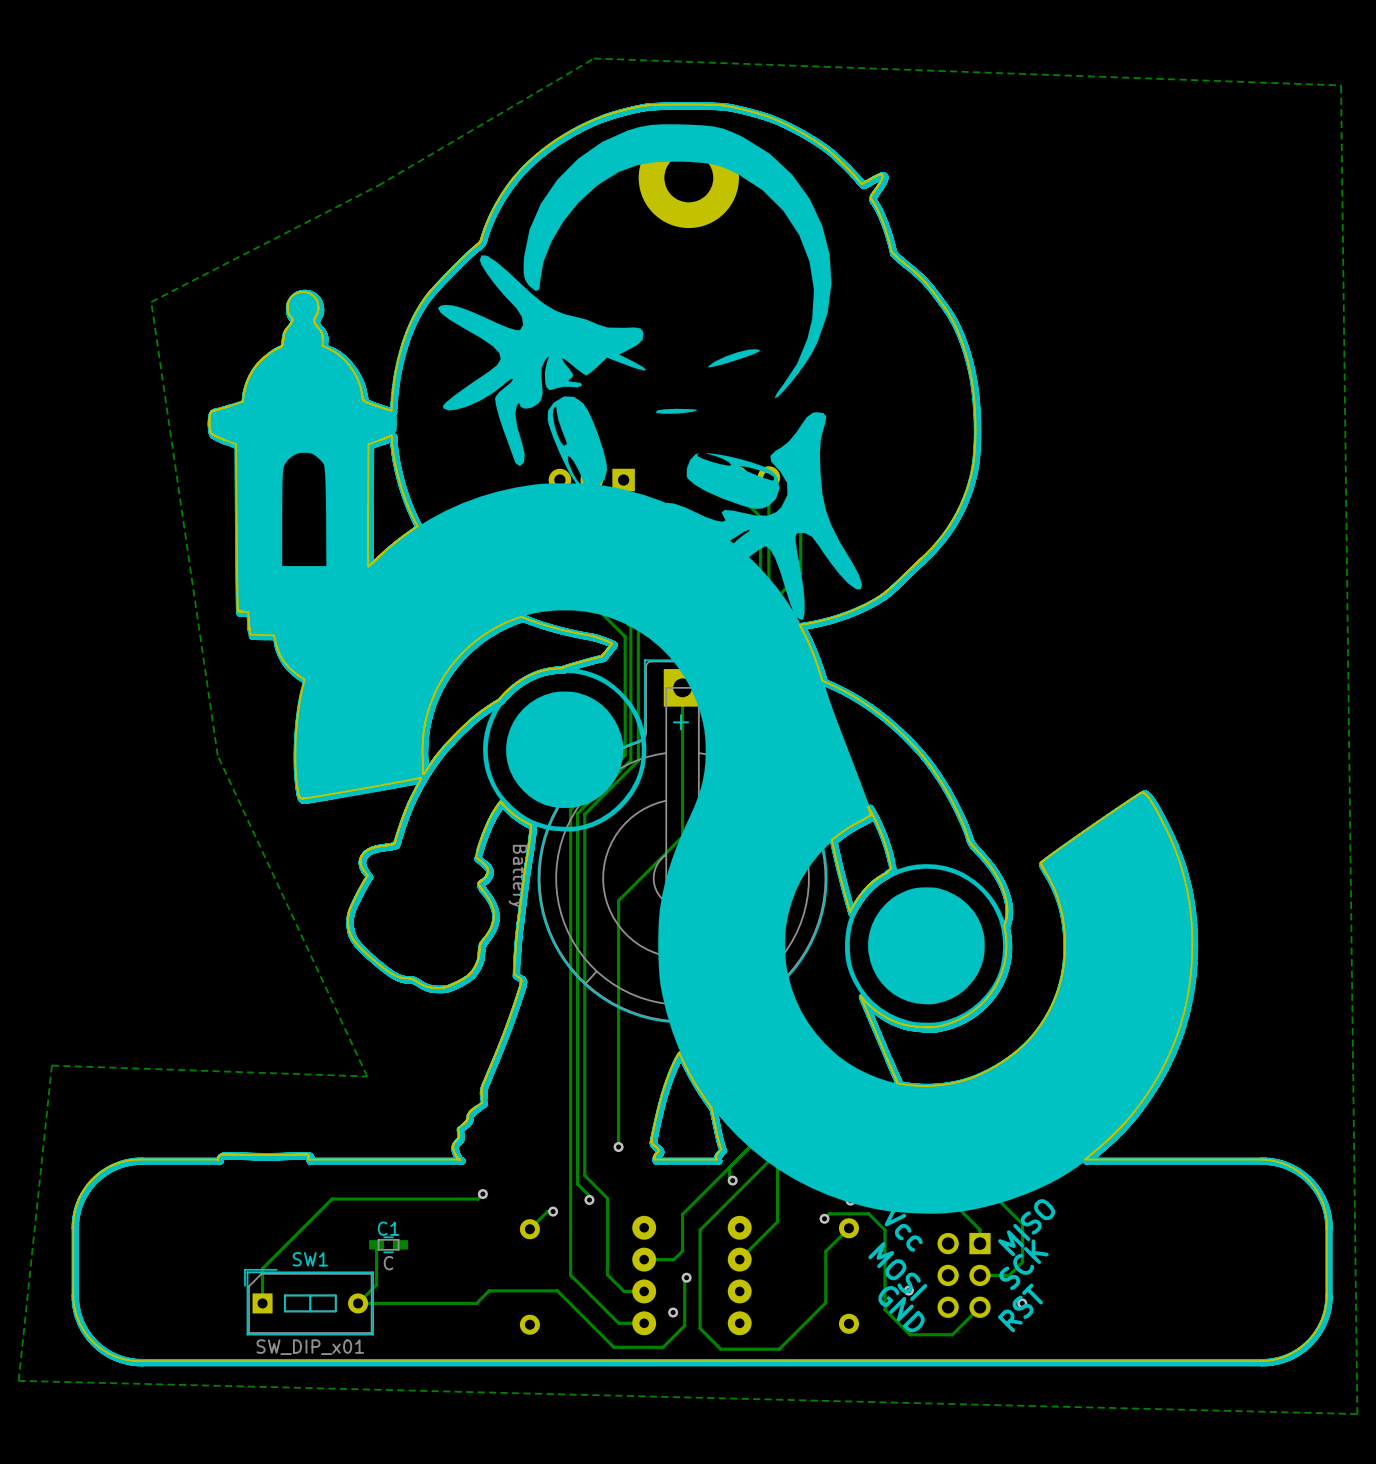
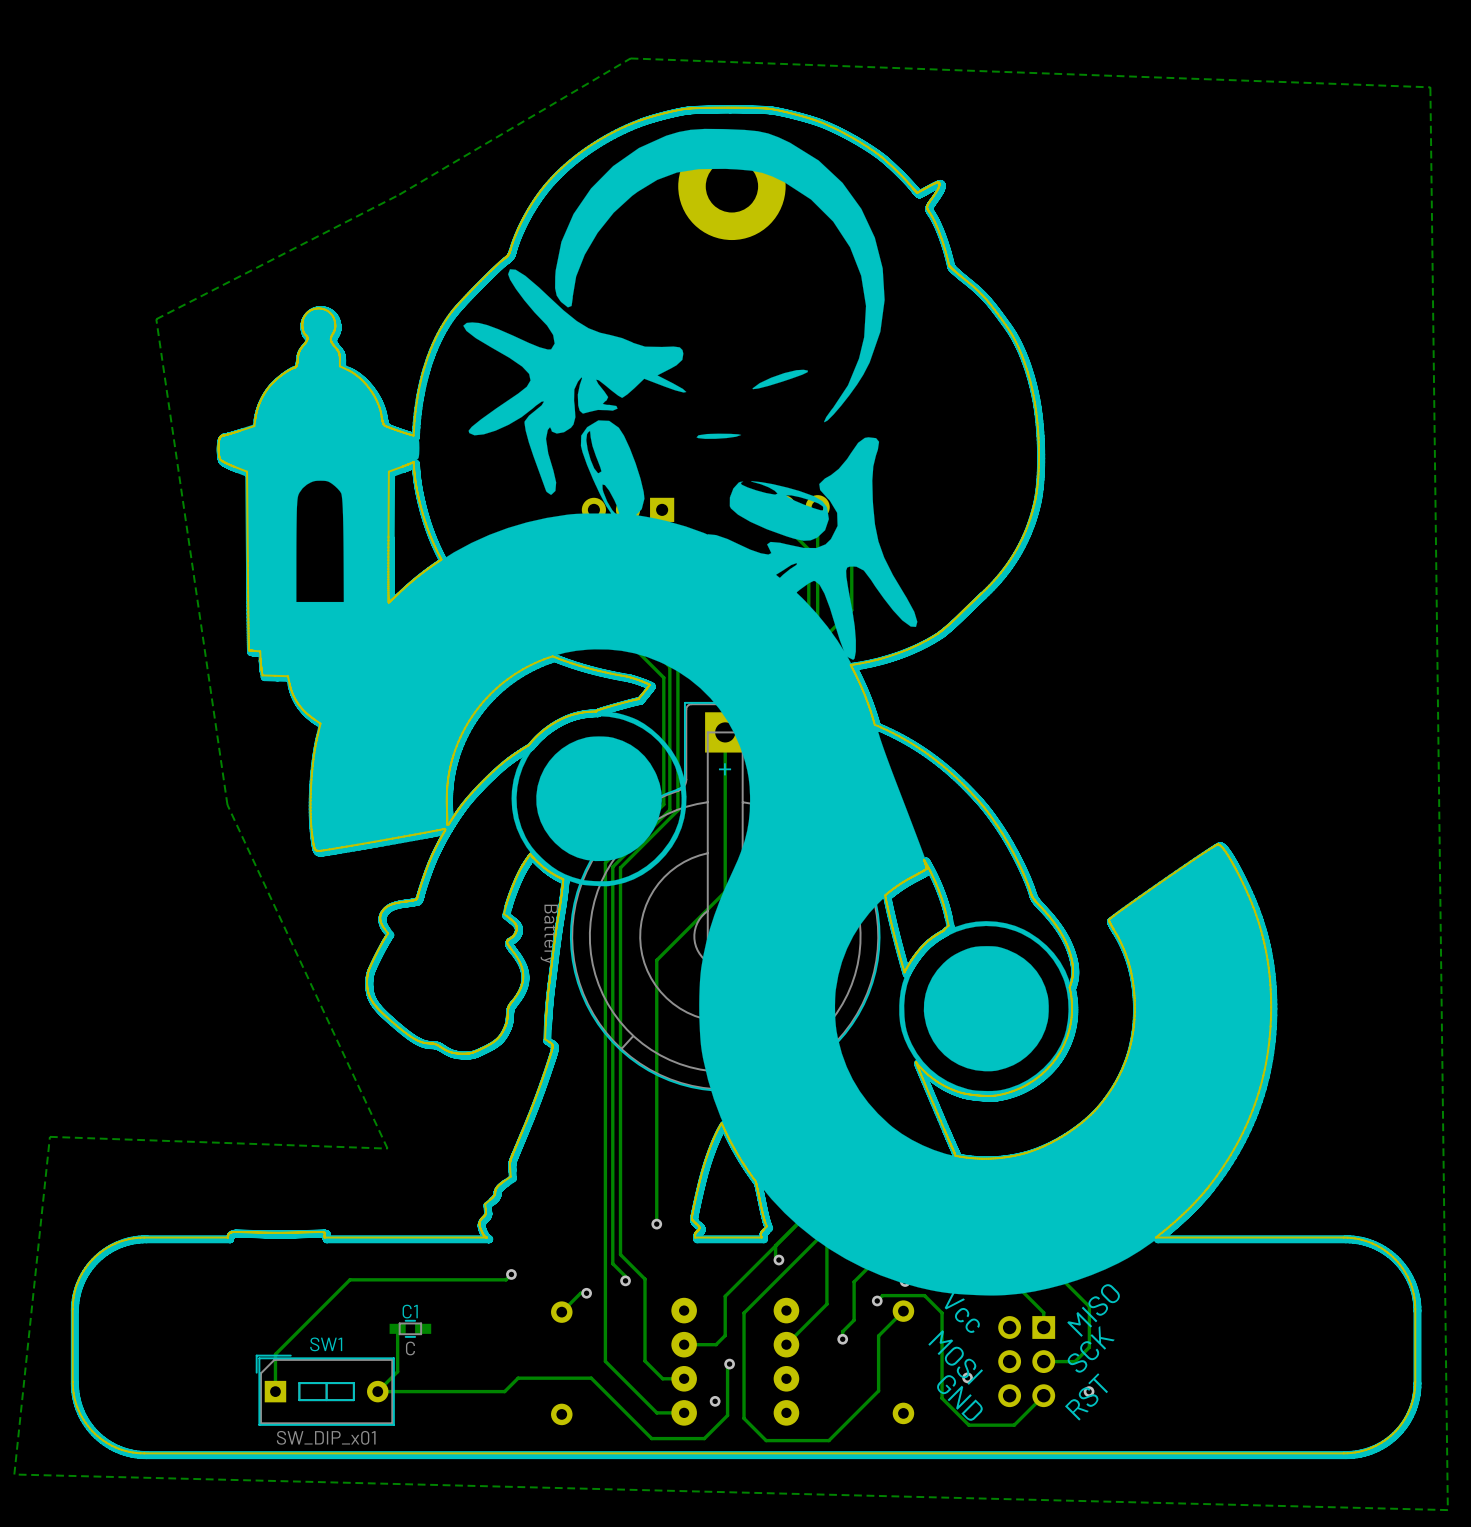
track: none -> (871, 1264) (854, 1281) (854, 1320) (842, 1331) (842, 1339)
via: none -> (842, 1339)

